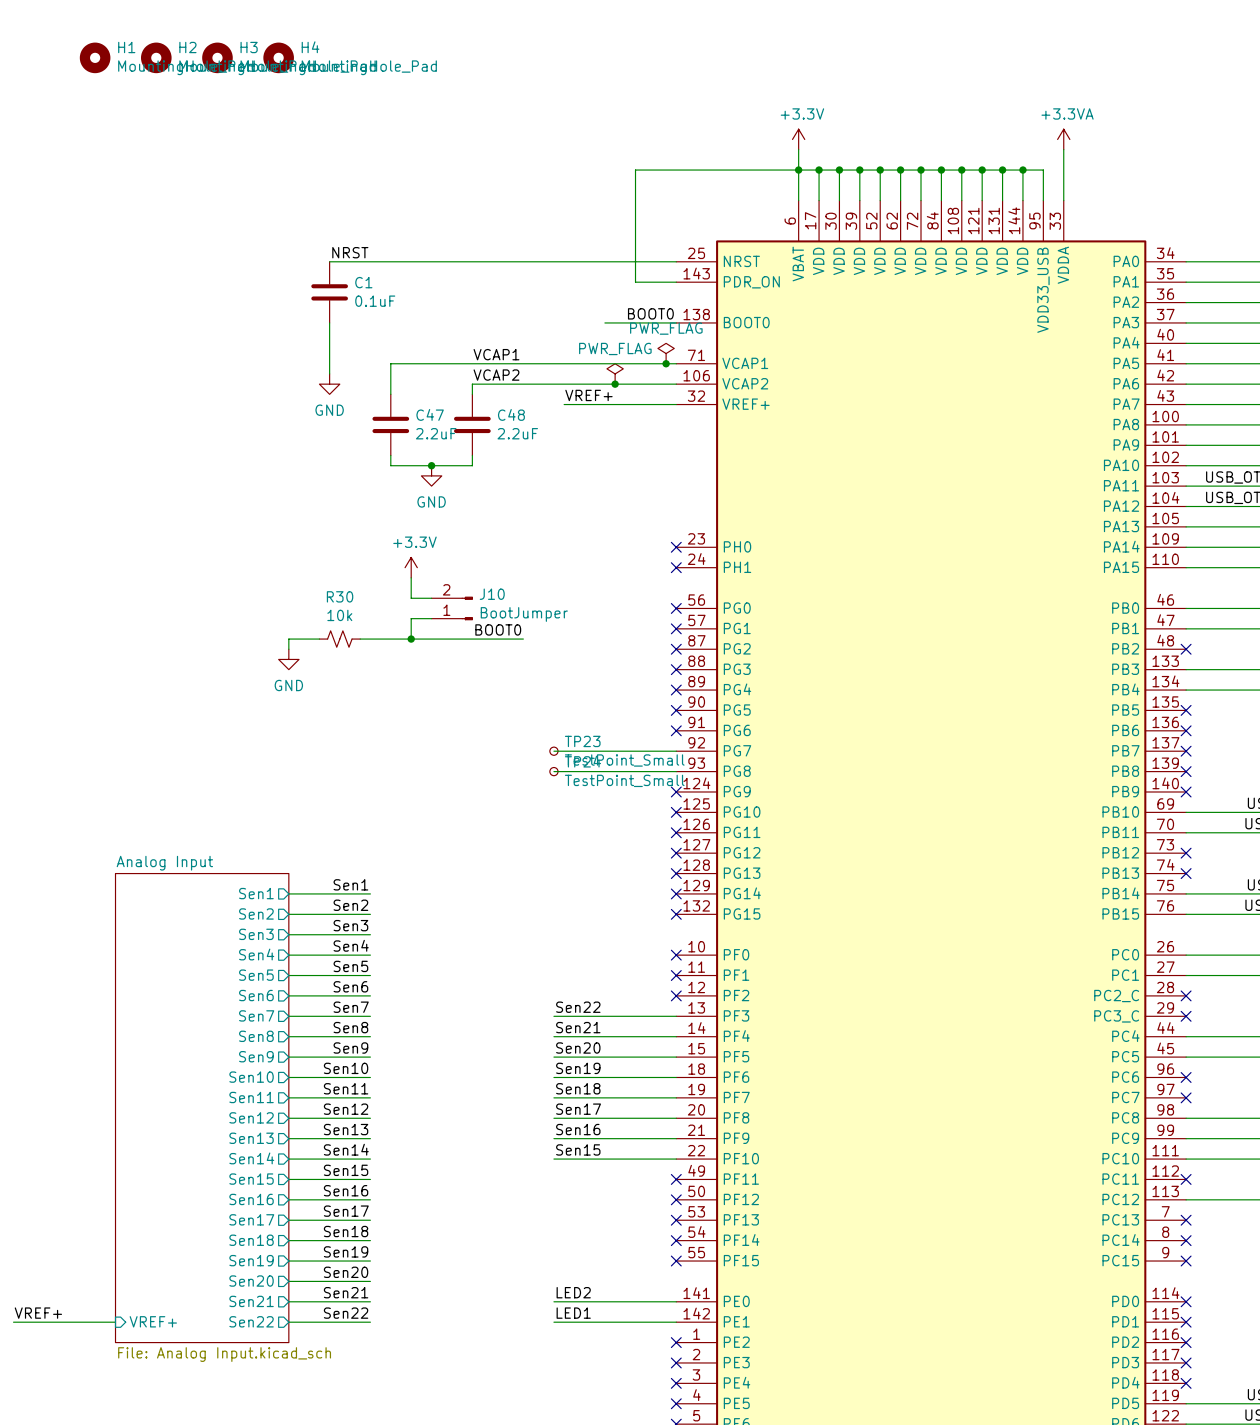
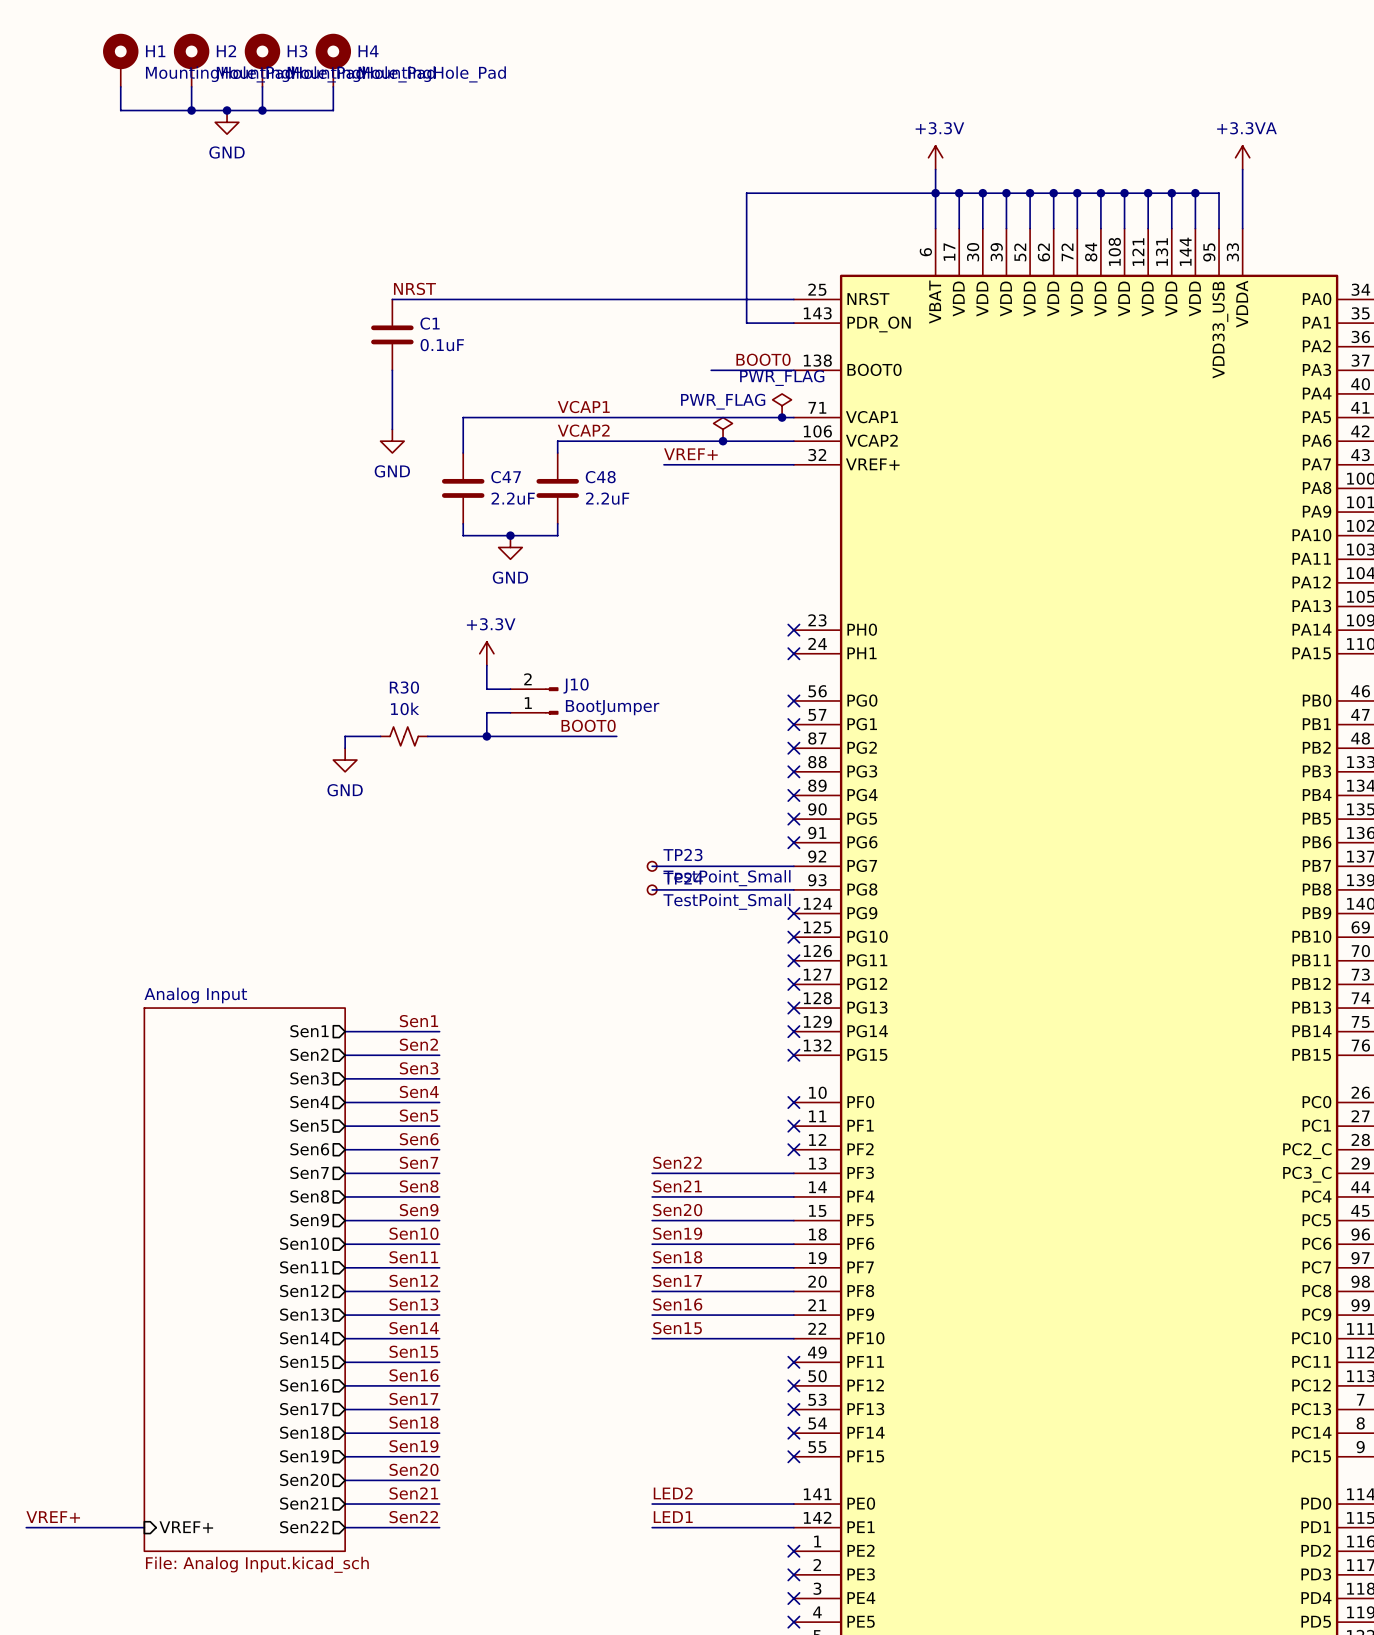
H1 symbol: [79, 42, 111, 74] -> [103, 33, 139, 87]
H2 symbol: [141, 42, 172, 74] -> [173, 33, 210, 87]
H3 symbol: [202, 42, 233, 74] -> [244, 33, 281, 87]
H4 symbol: [263, 42, 294, 74] -> [315, 33, 352, 87]
wire: none -> (120, 86) (120, 110) (333, 110) (333, 86)
wire: none -> (191, 86) (191, 110)
wire: none -> (262, 86) (262, 110)
junction: none -> (191, 110)
junction: none -> (227, 110)
junction: none -> (262, 110)
power symbol: none -> GND (227, 122)

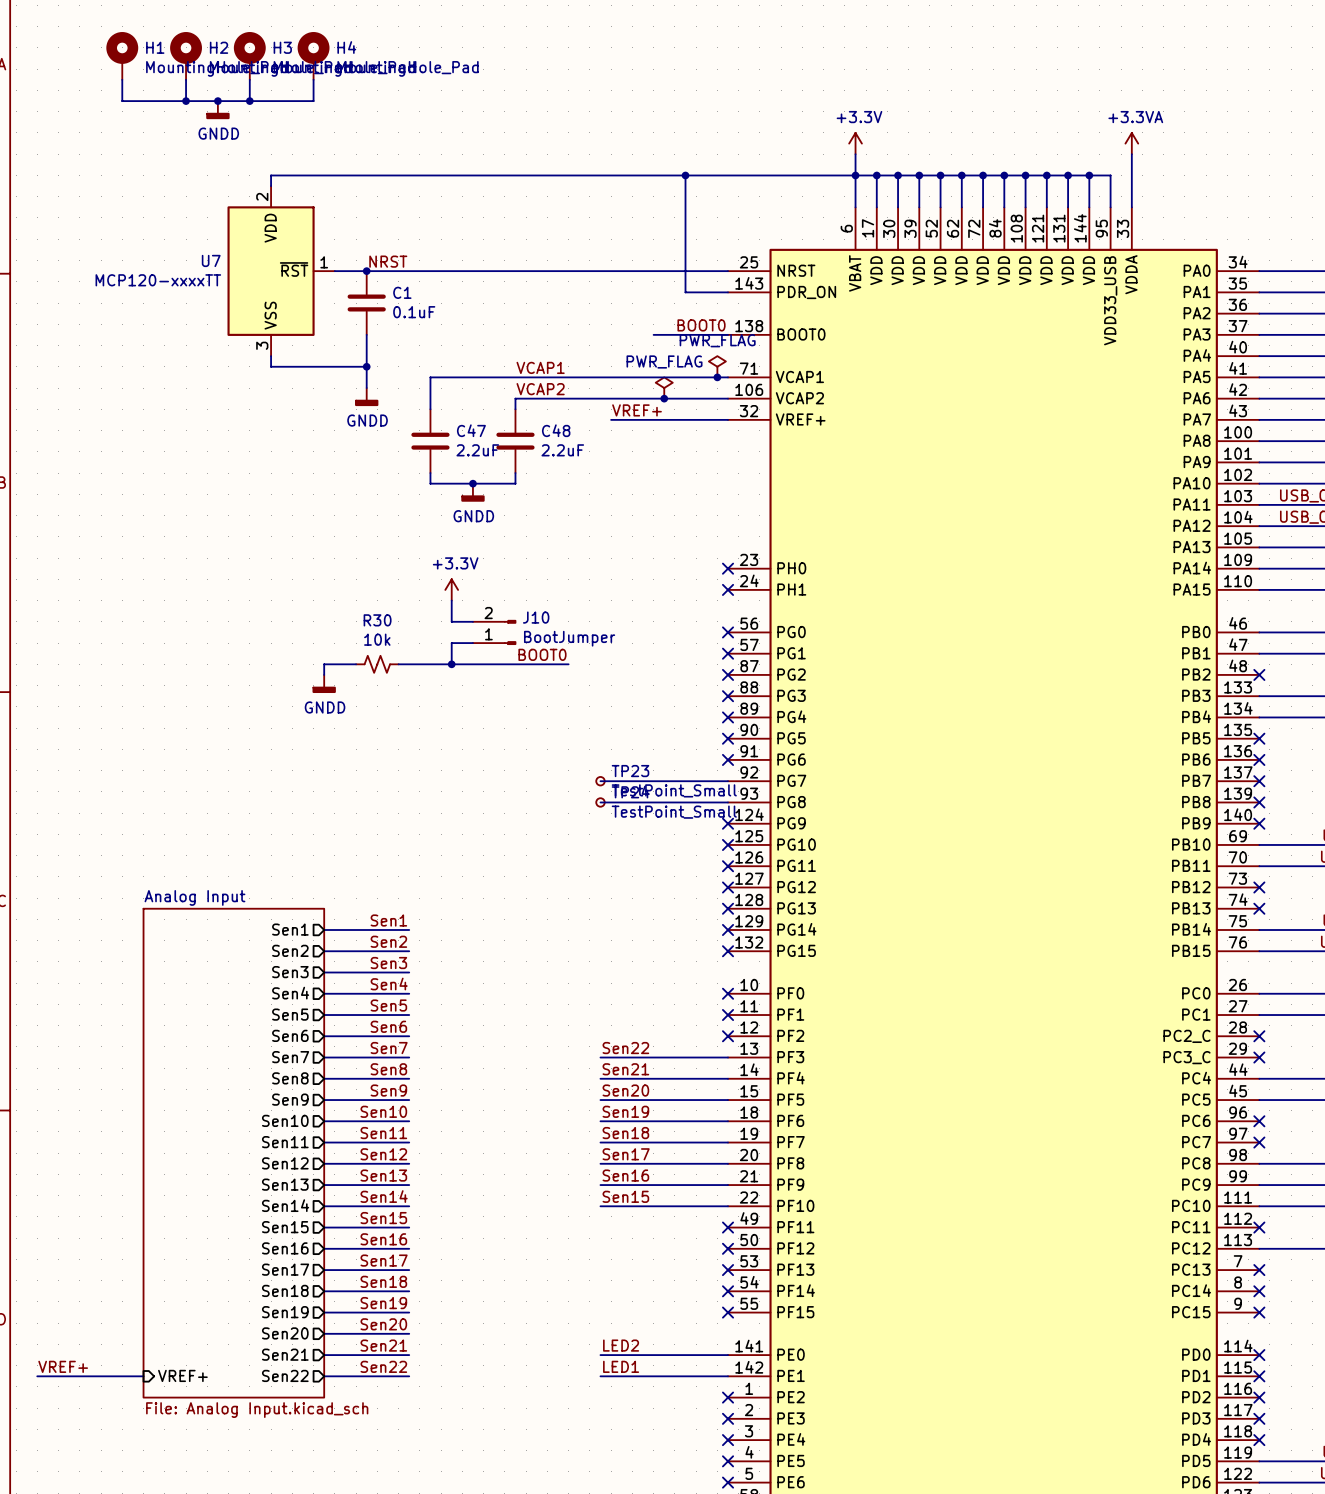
power symbol: GND (227, 122) -> GNDD (217, 110)
wire: none -> (685, 175) (271, 175) (271, 186)
junction: none -> (685, 175)
U7: none -> MCP120-xxxxTT (281, 271)
wire: none -> (334, 271) (366, 271)
junction: none -> (366, 271)
wire: none -> (271, 356) (271, 366) (366, 366)
junction: none -> (366, 366)
power symbol: GND (392, 441) -> GNDD (366, 397)
power symbol: GND (510, 547) -> GNDD (472, 492)
power symbol: GND (345, 760) -> GNDD (324, 683)

